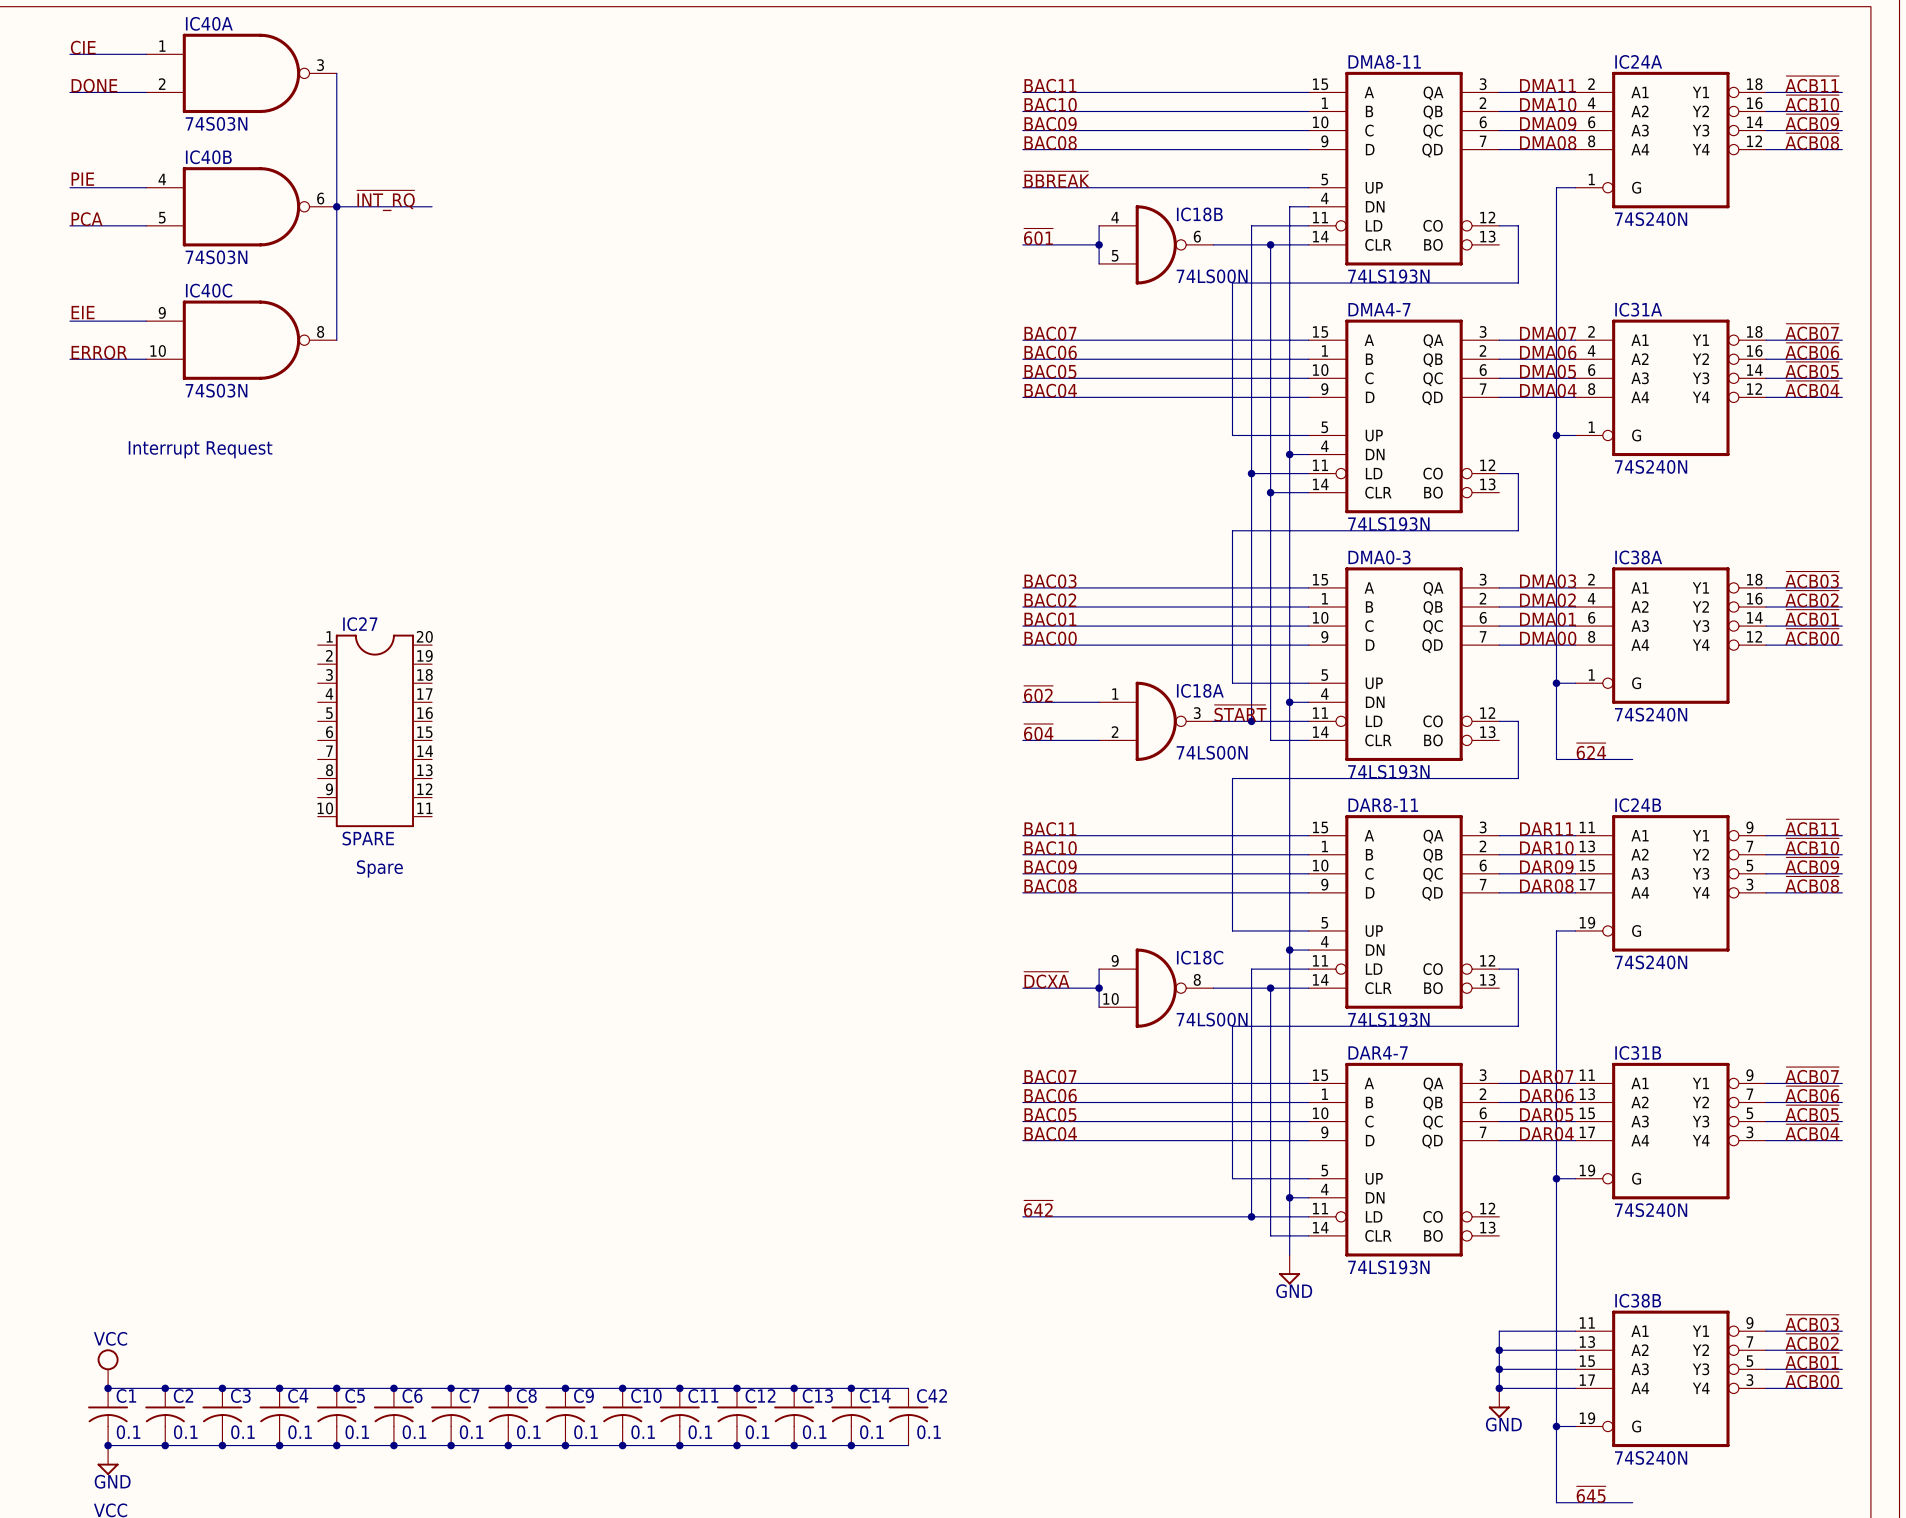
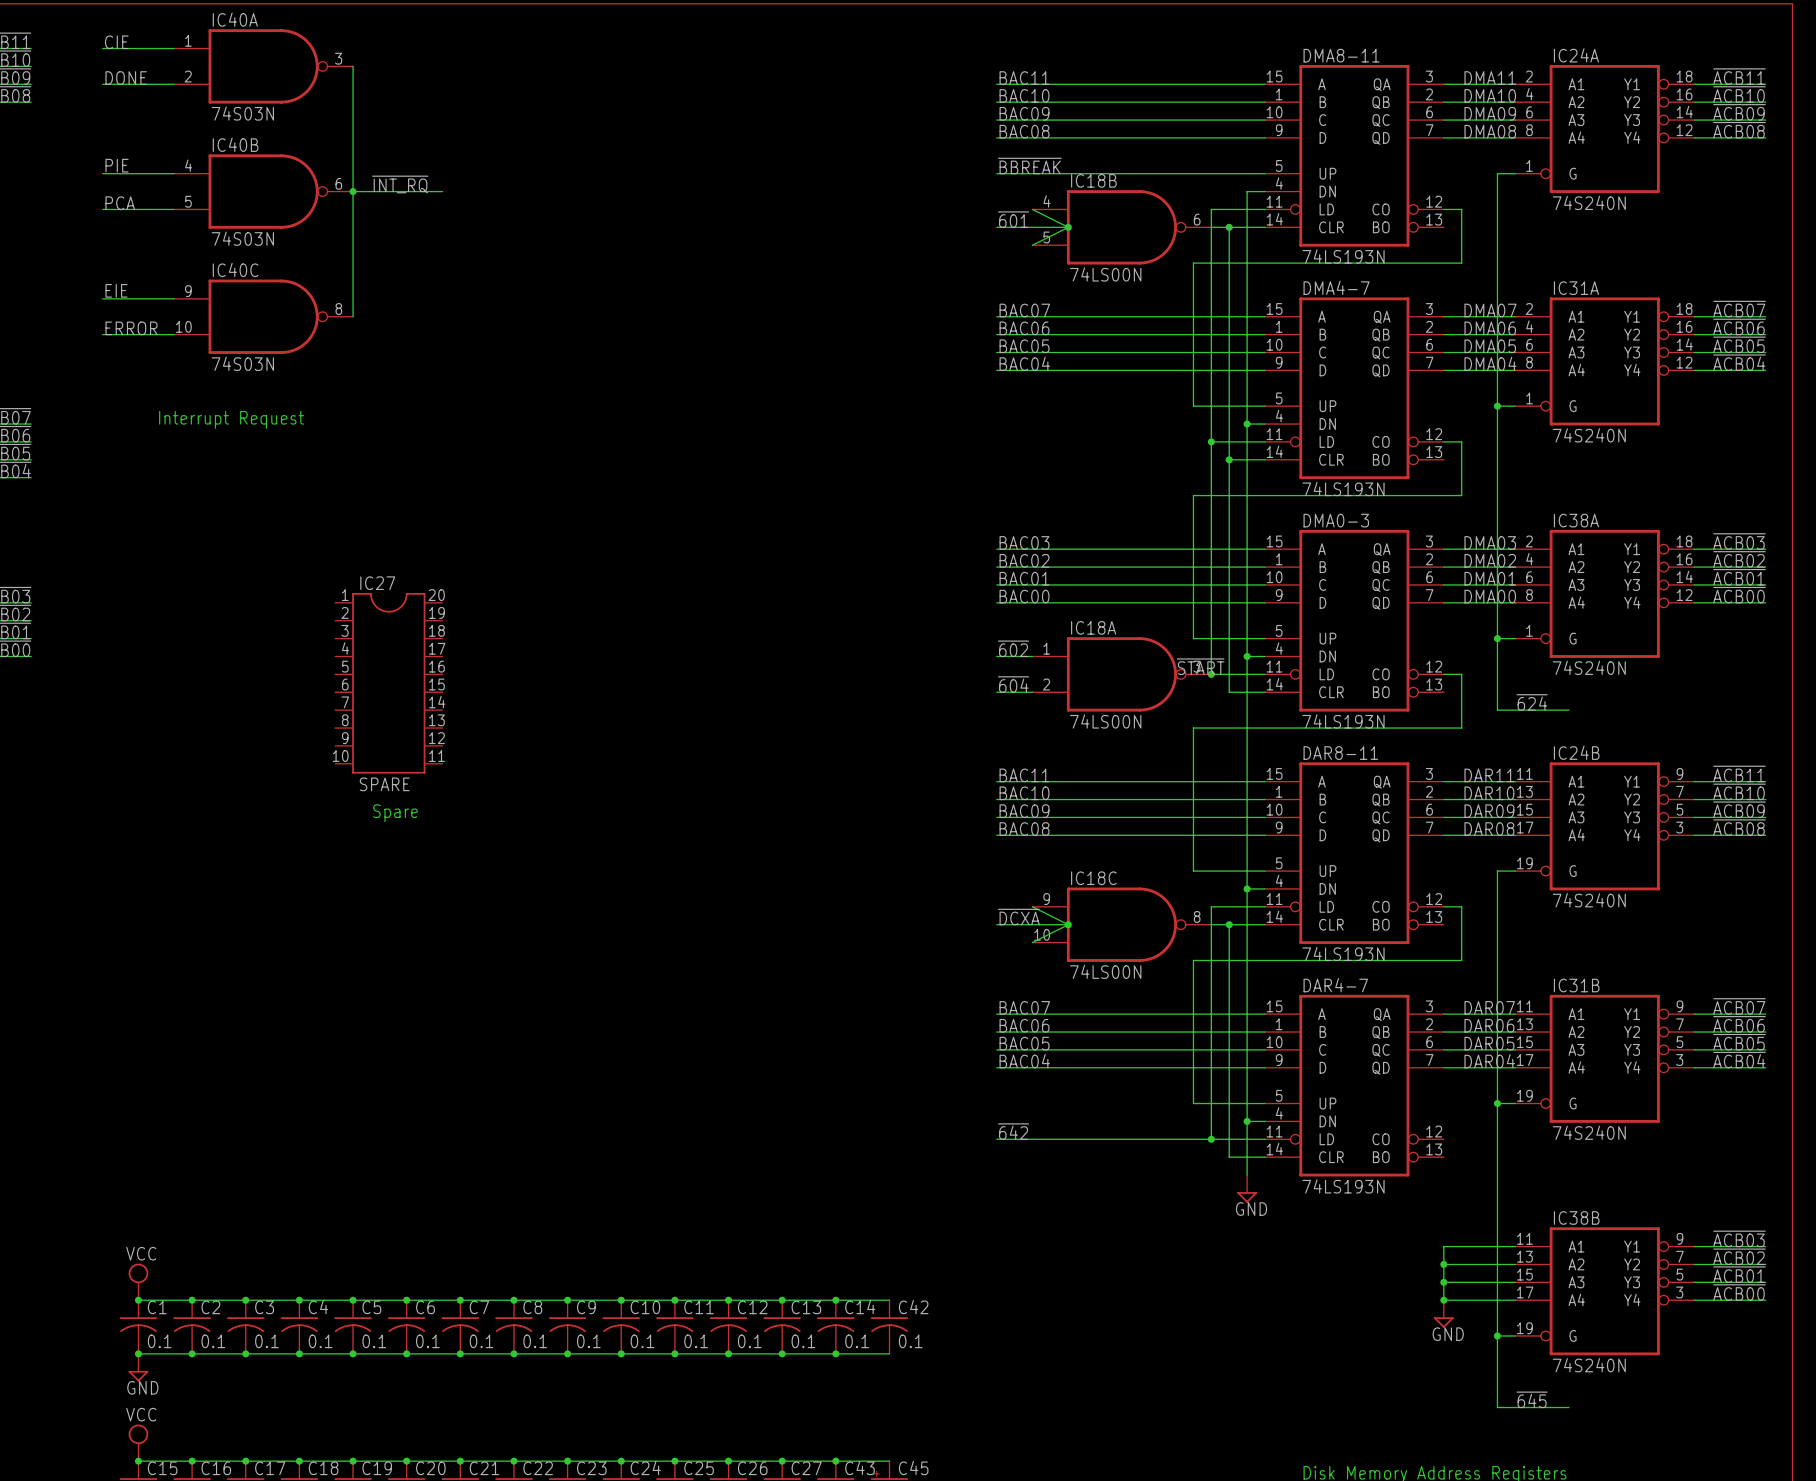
IC18B symbol: [1099, 205, 1214, 285] -> [1032, 190, 1212, 265]
IC18B name position: IC18B (1199, 214) -> IC18B (1093, 180)
wire: none -> (1032, 209) (1068, 227) (1032, 245)
IC18B value position: 74LS00N (1212, 276) -> 74LS00N (1105, 274)
IC18A symbol: [1099, 681, 1214, 761] -> [1032, 637, 1212, 712]
IC18A name position: IC18A (1200, 690) -> IC18A (1093, 627)
IC18A value position: 74LS00N (1212, 752) -> 74LS00N (1105, 721)
IC18C symbol: [1099, 948, 1214, 1028] -> [1032, 887, 1212, 962]
IC18C name position: IC18C (1200, 957) -> IC18C (1093, 878)
wire: none -> (1032, 906) (1068, 924) (1032, 942)
IC18C value position: 74LS00N (1212, 1019) -> 74LS00N (1105, 971)

